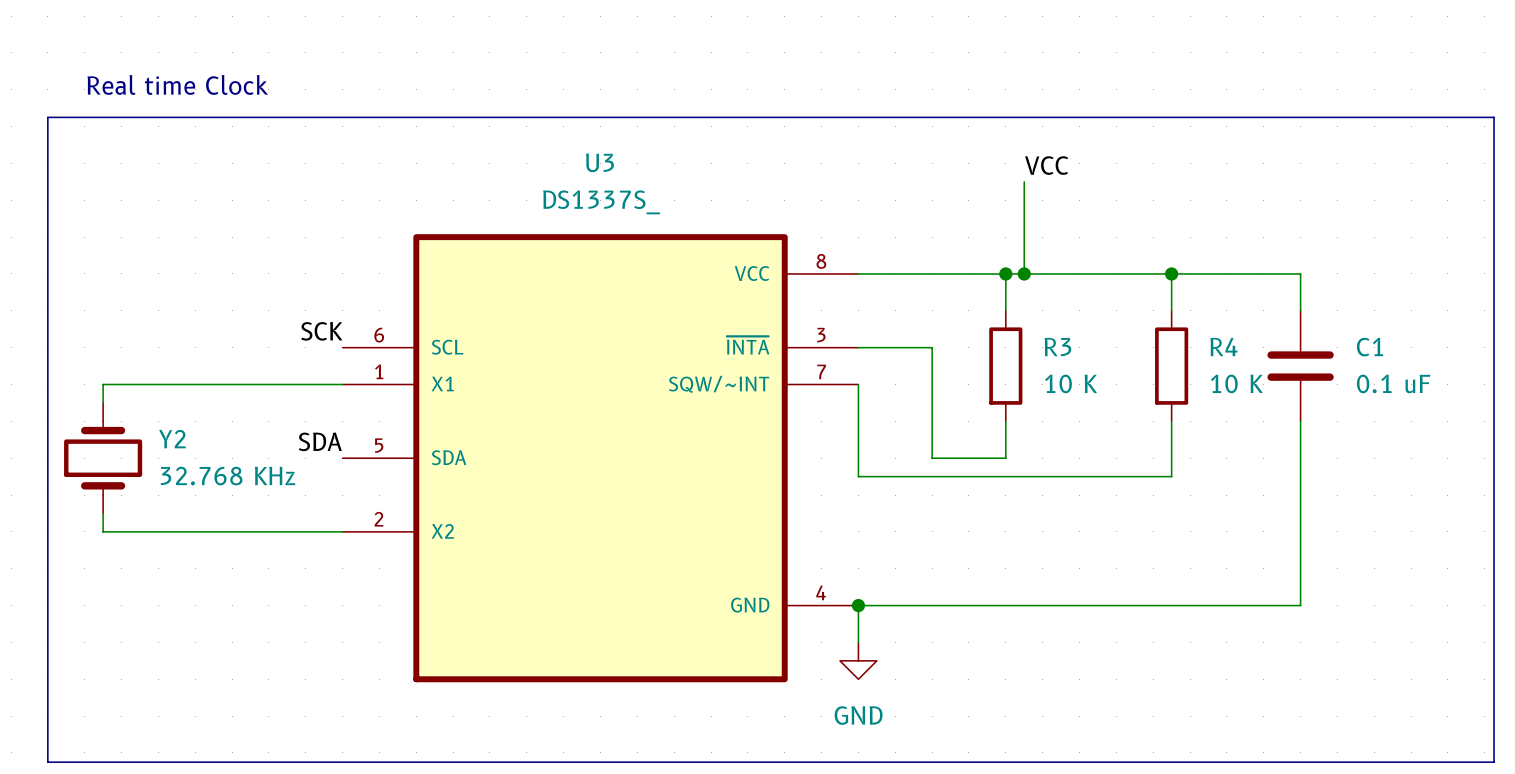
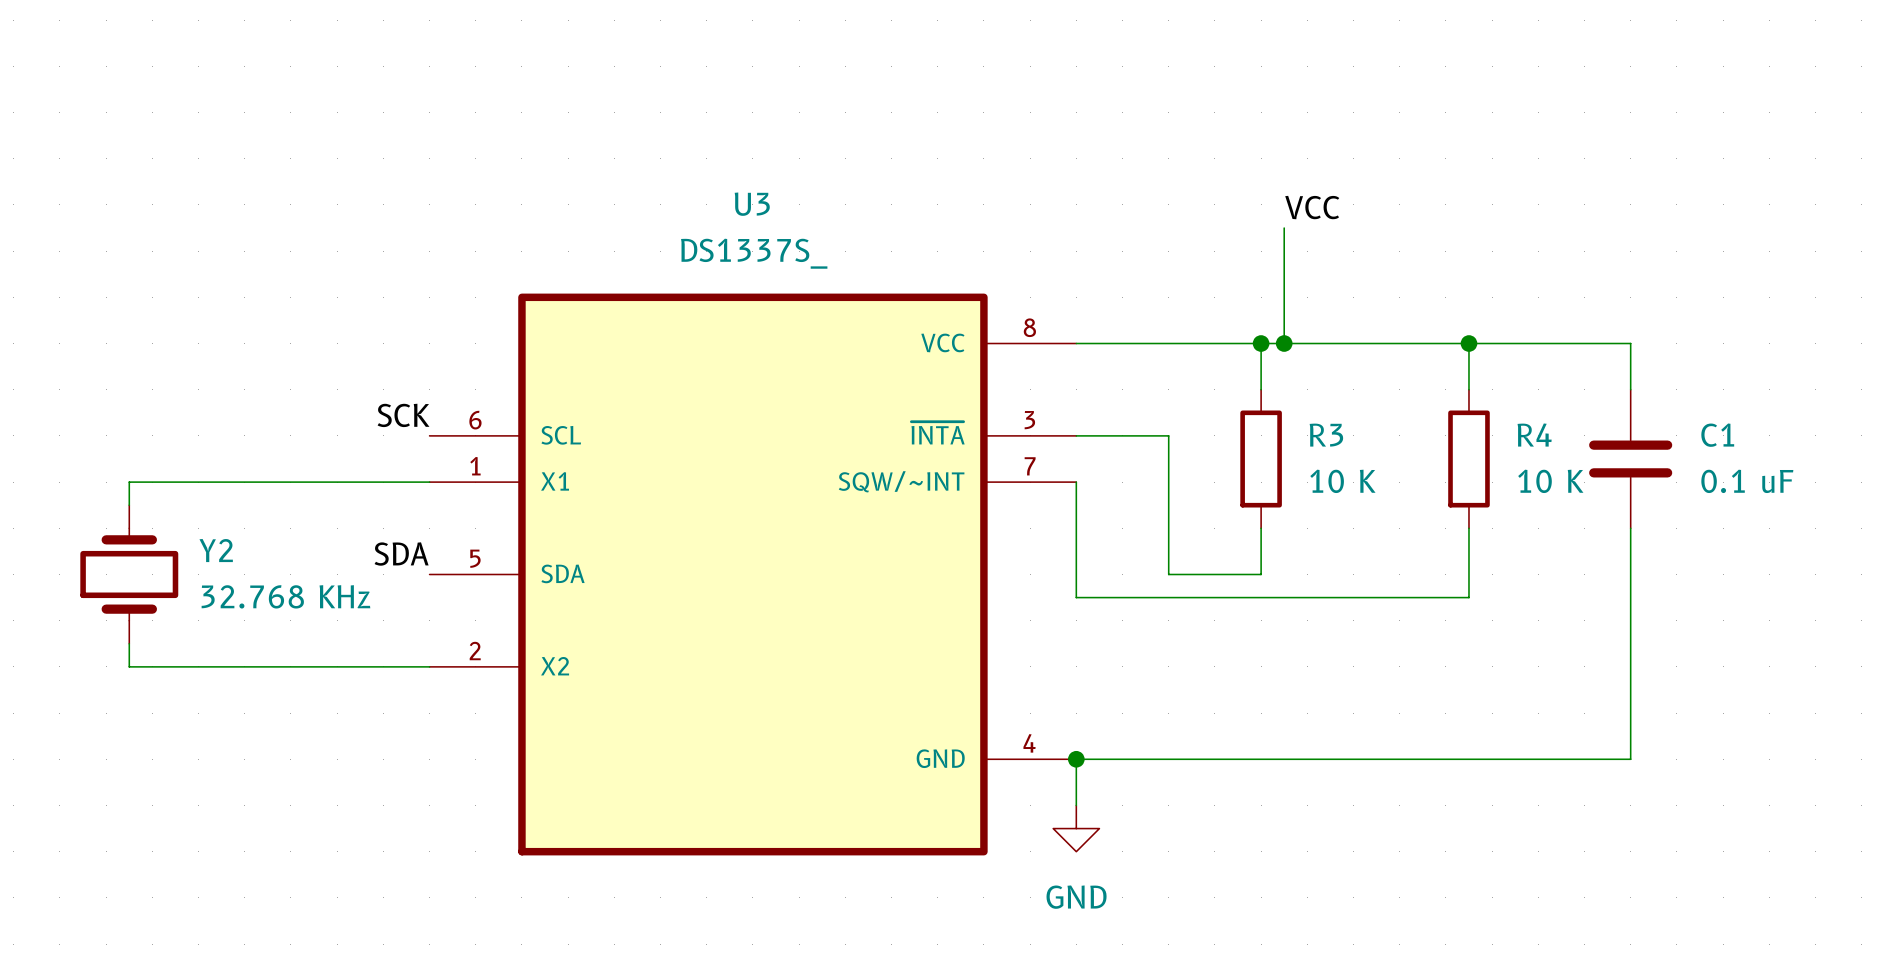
text: Real time Clock (177, 84) -> none
line: (47, 117) (1494, 117) (1494, 762) (47, 762) (47, 117) -> none

